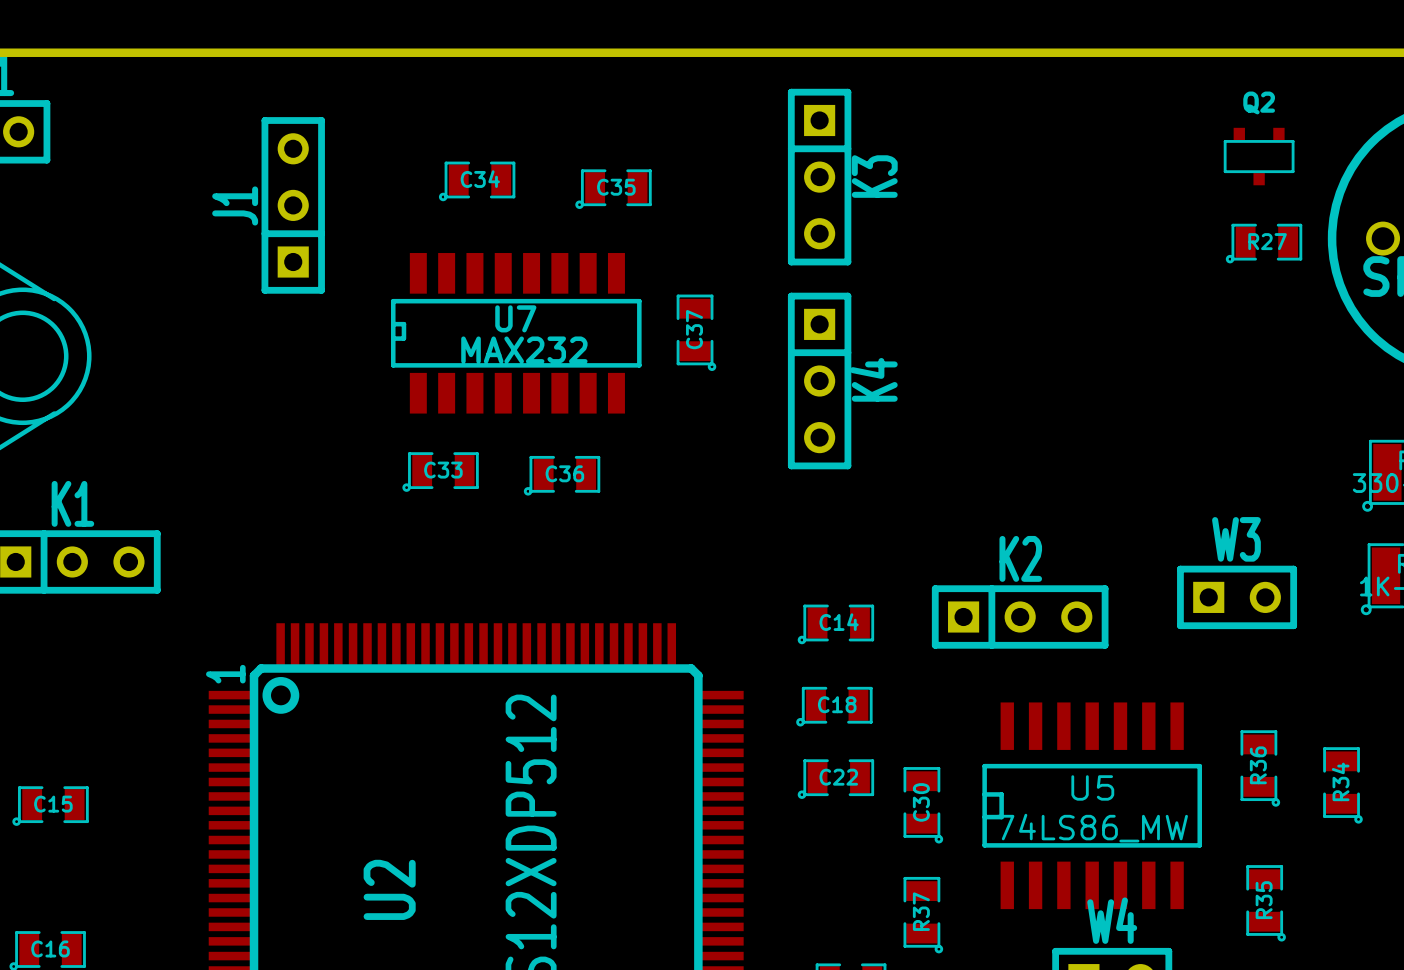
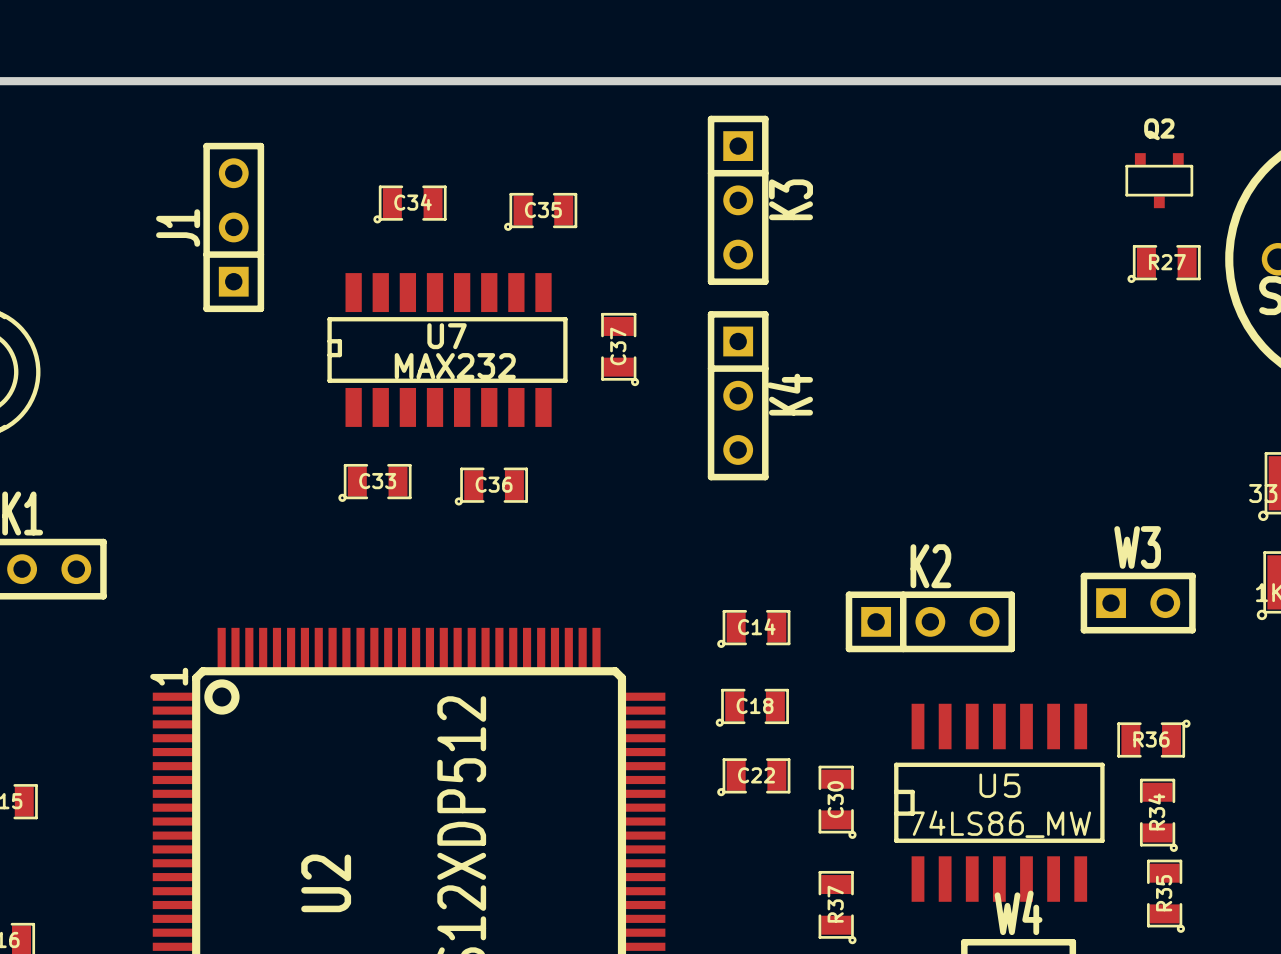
R36 rotation: 0° (1260, 768) -> 90° counterclockwise (1153, 738)
R34 position: (1342, 785) -> (1158, 815)

